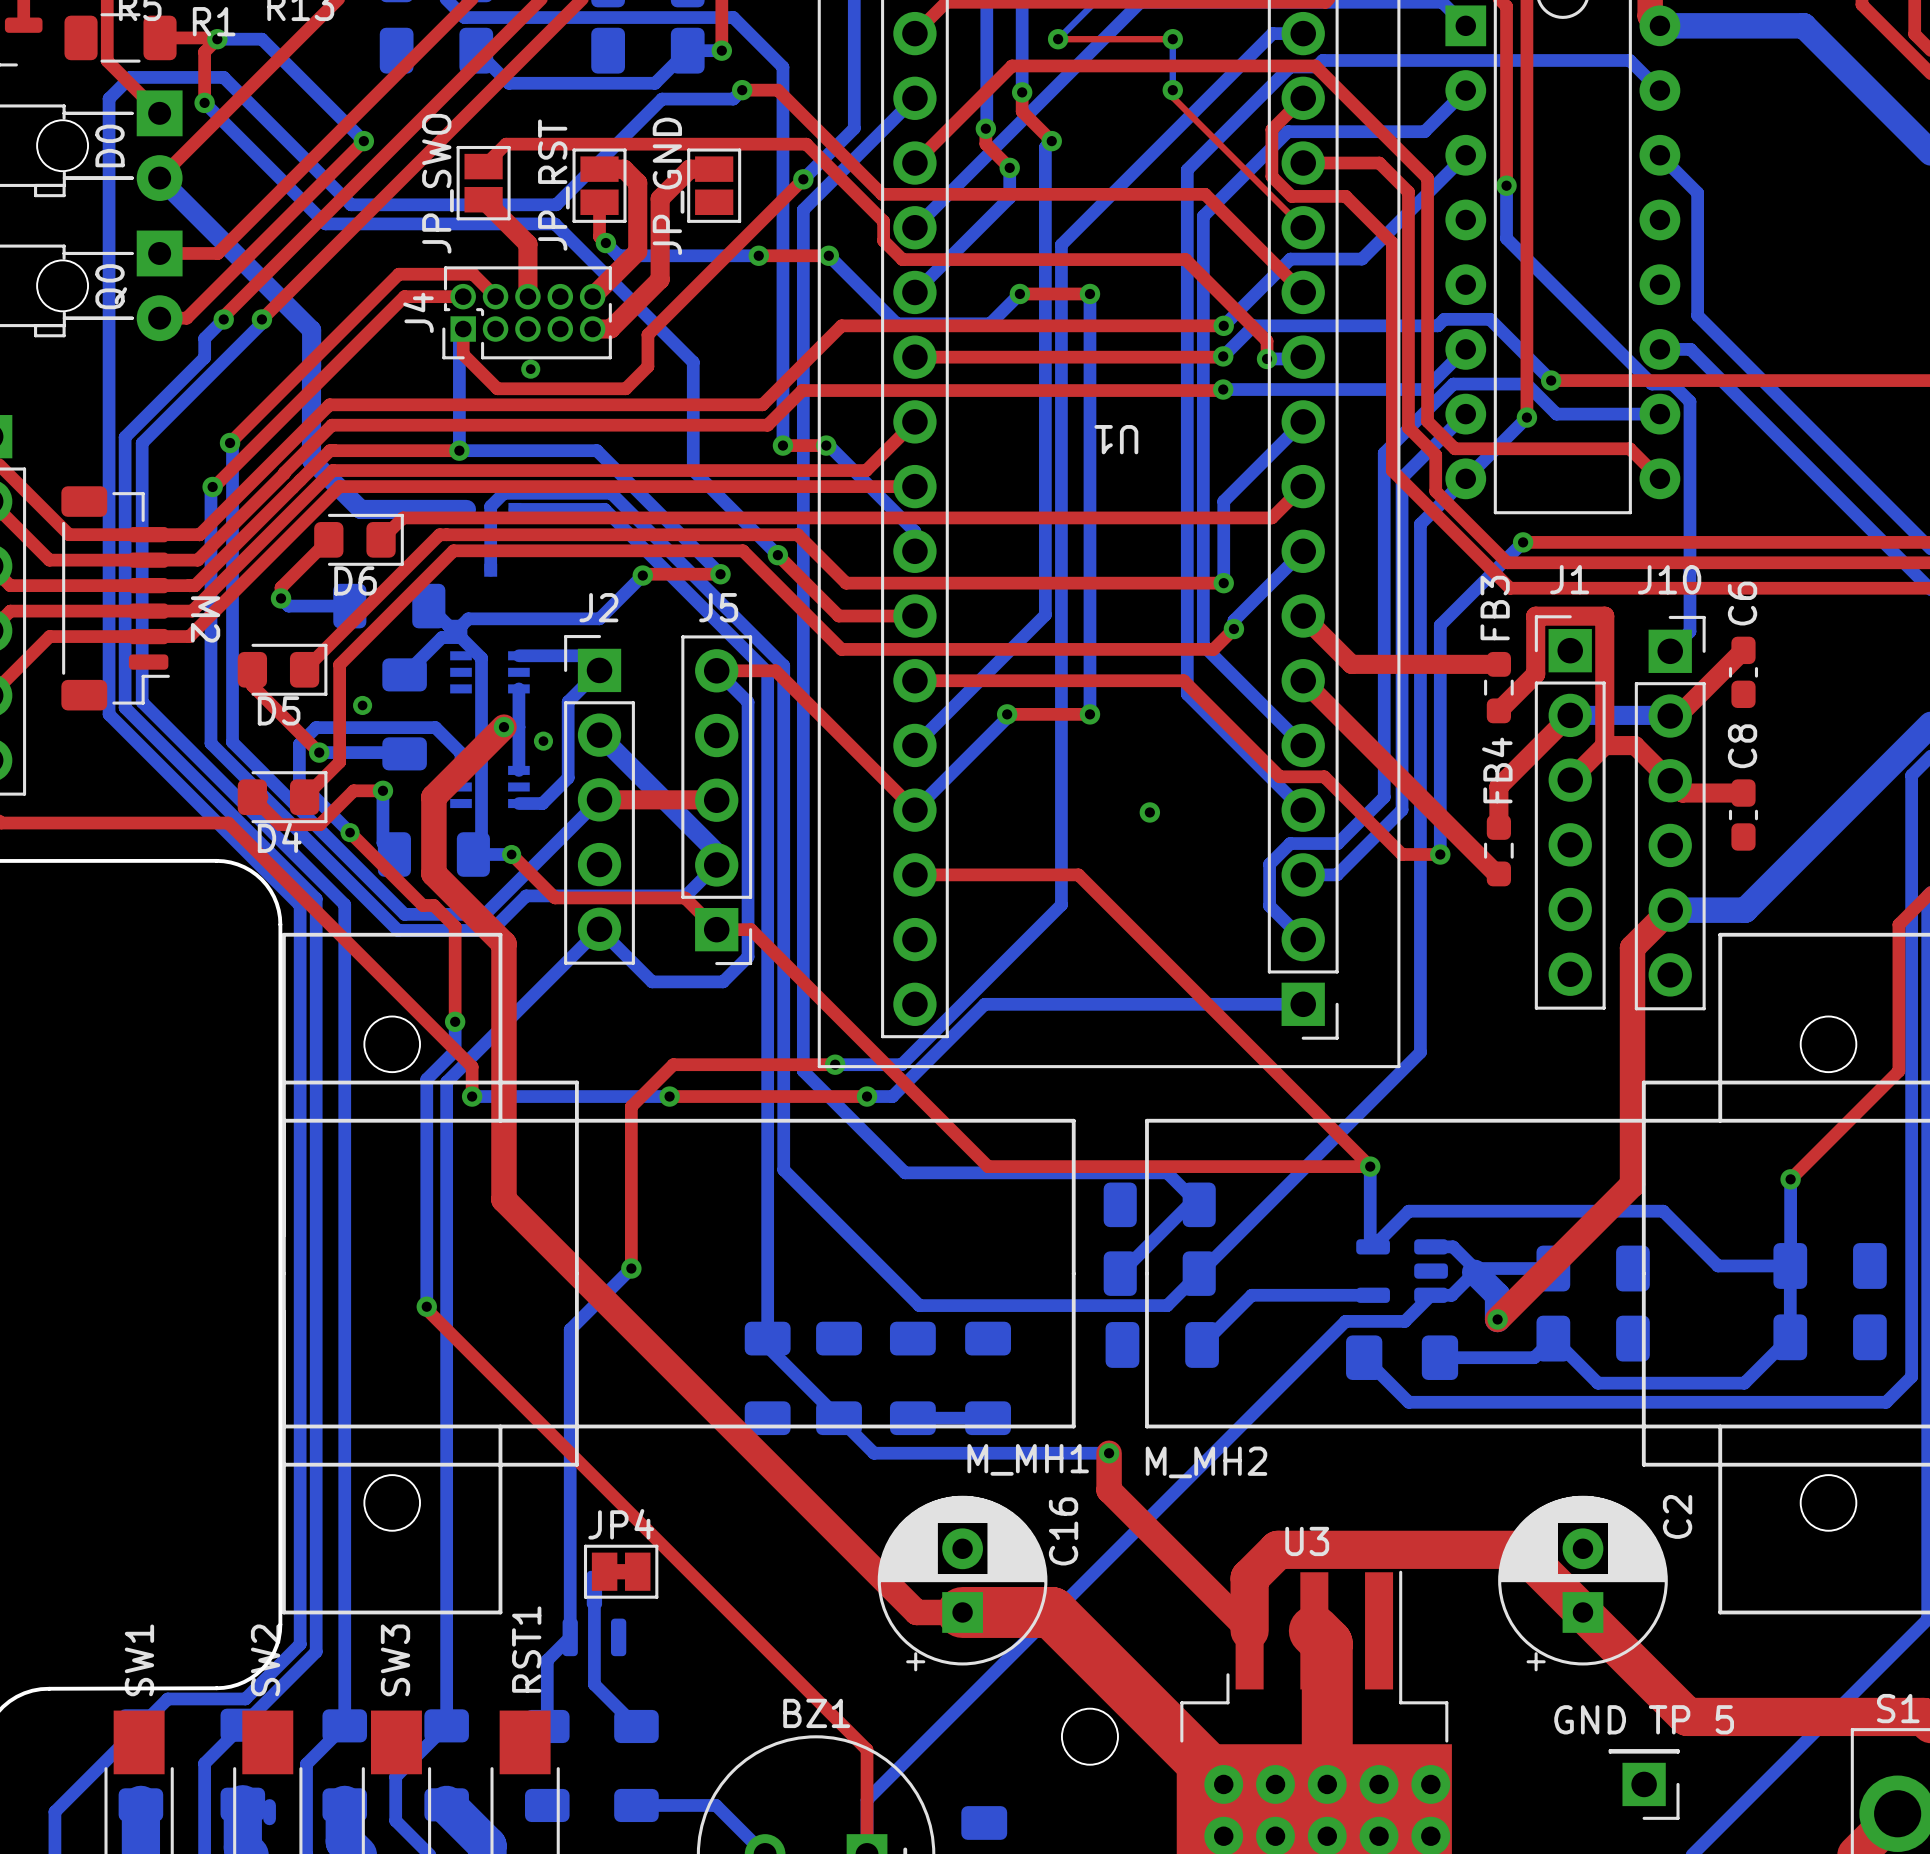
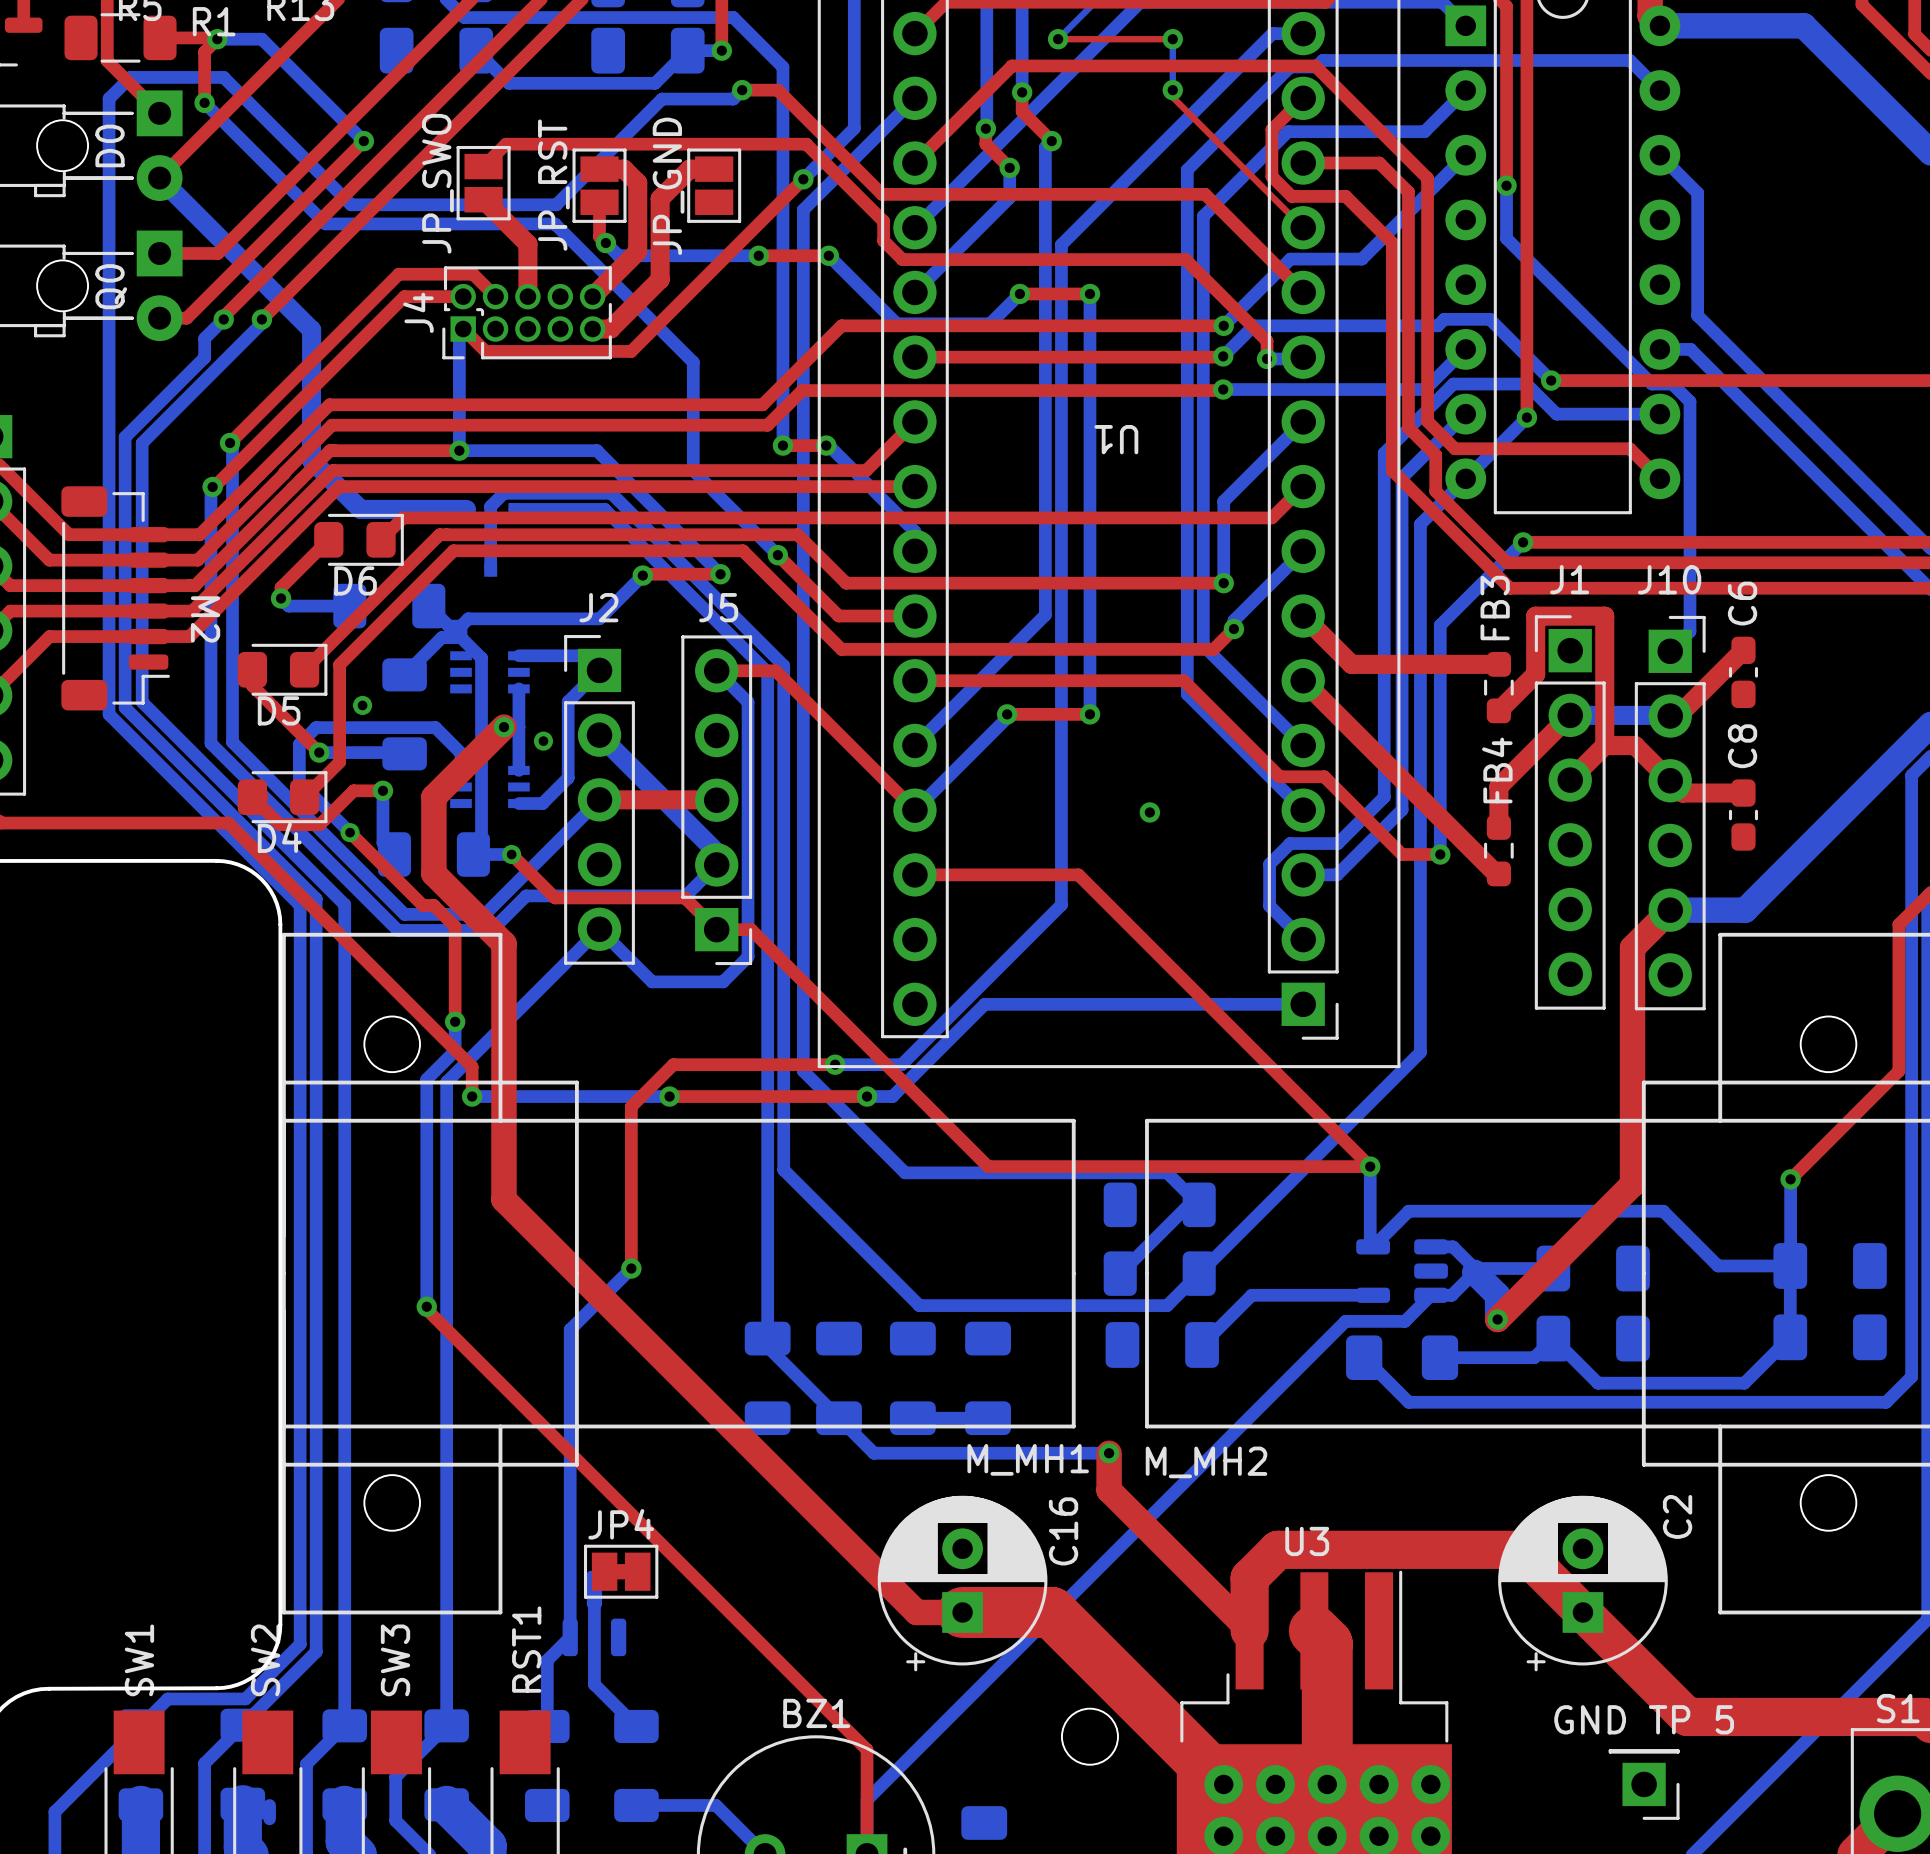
top track: (463, 329) (463, 354) (497, 388) (625, 388) (647, 366) (647, 334) -> (463, 329) (485, 351) (631, 351) (647, 334)
via: (530, 369) -> none

